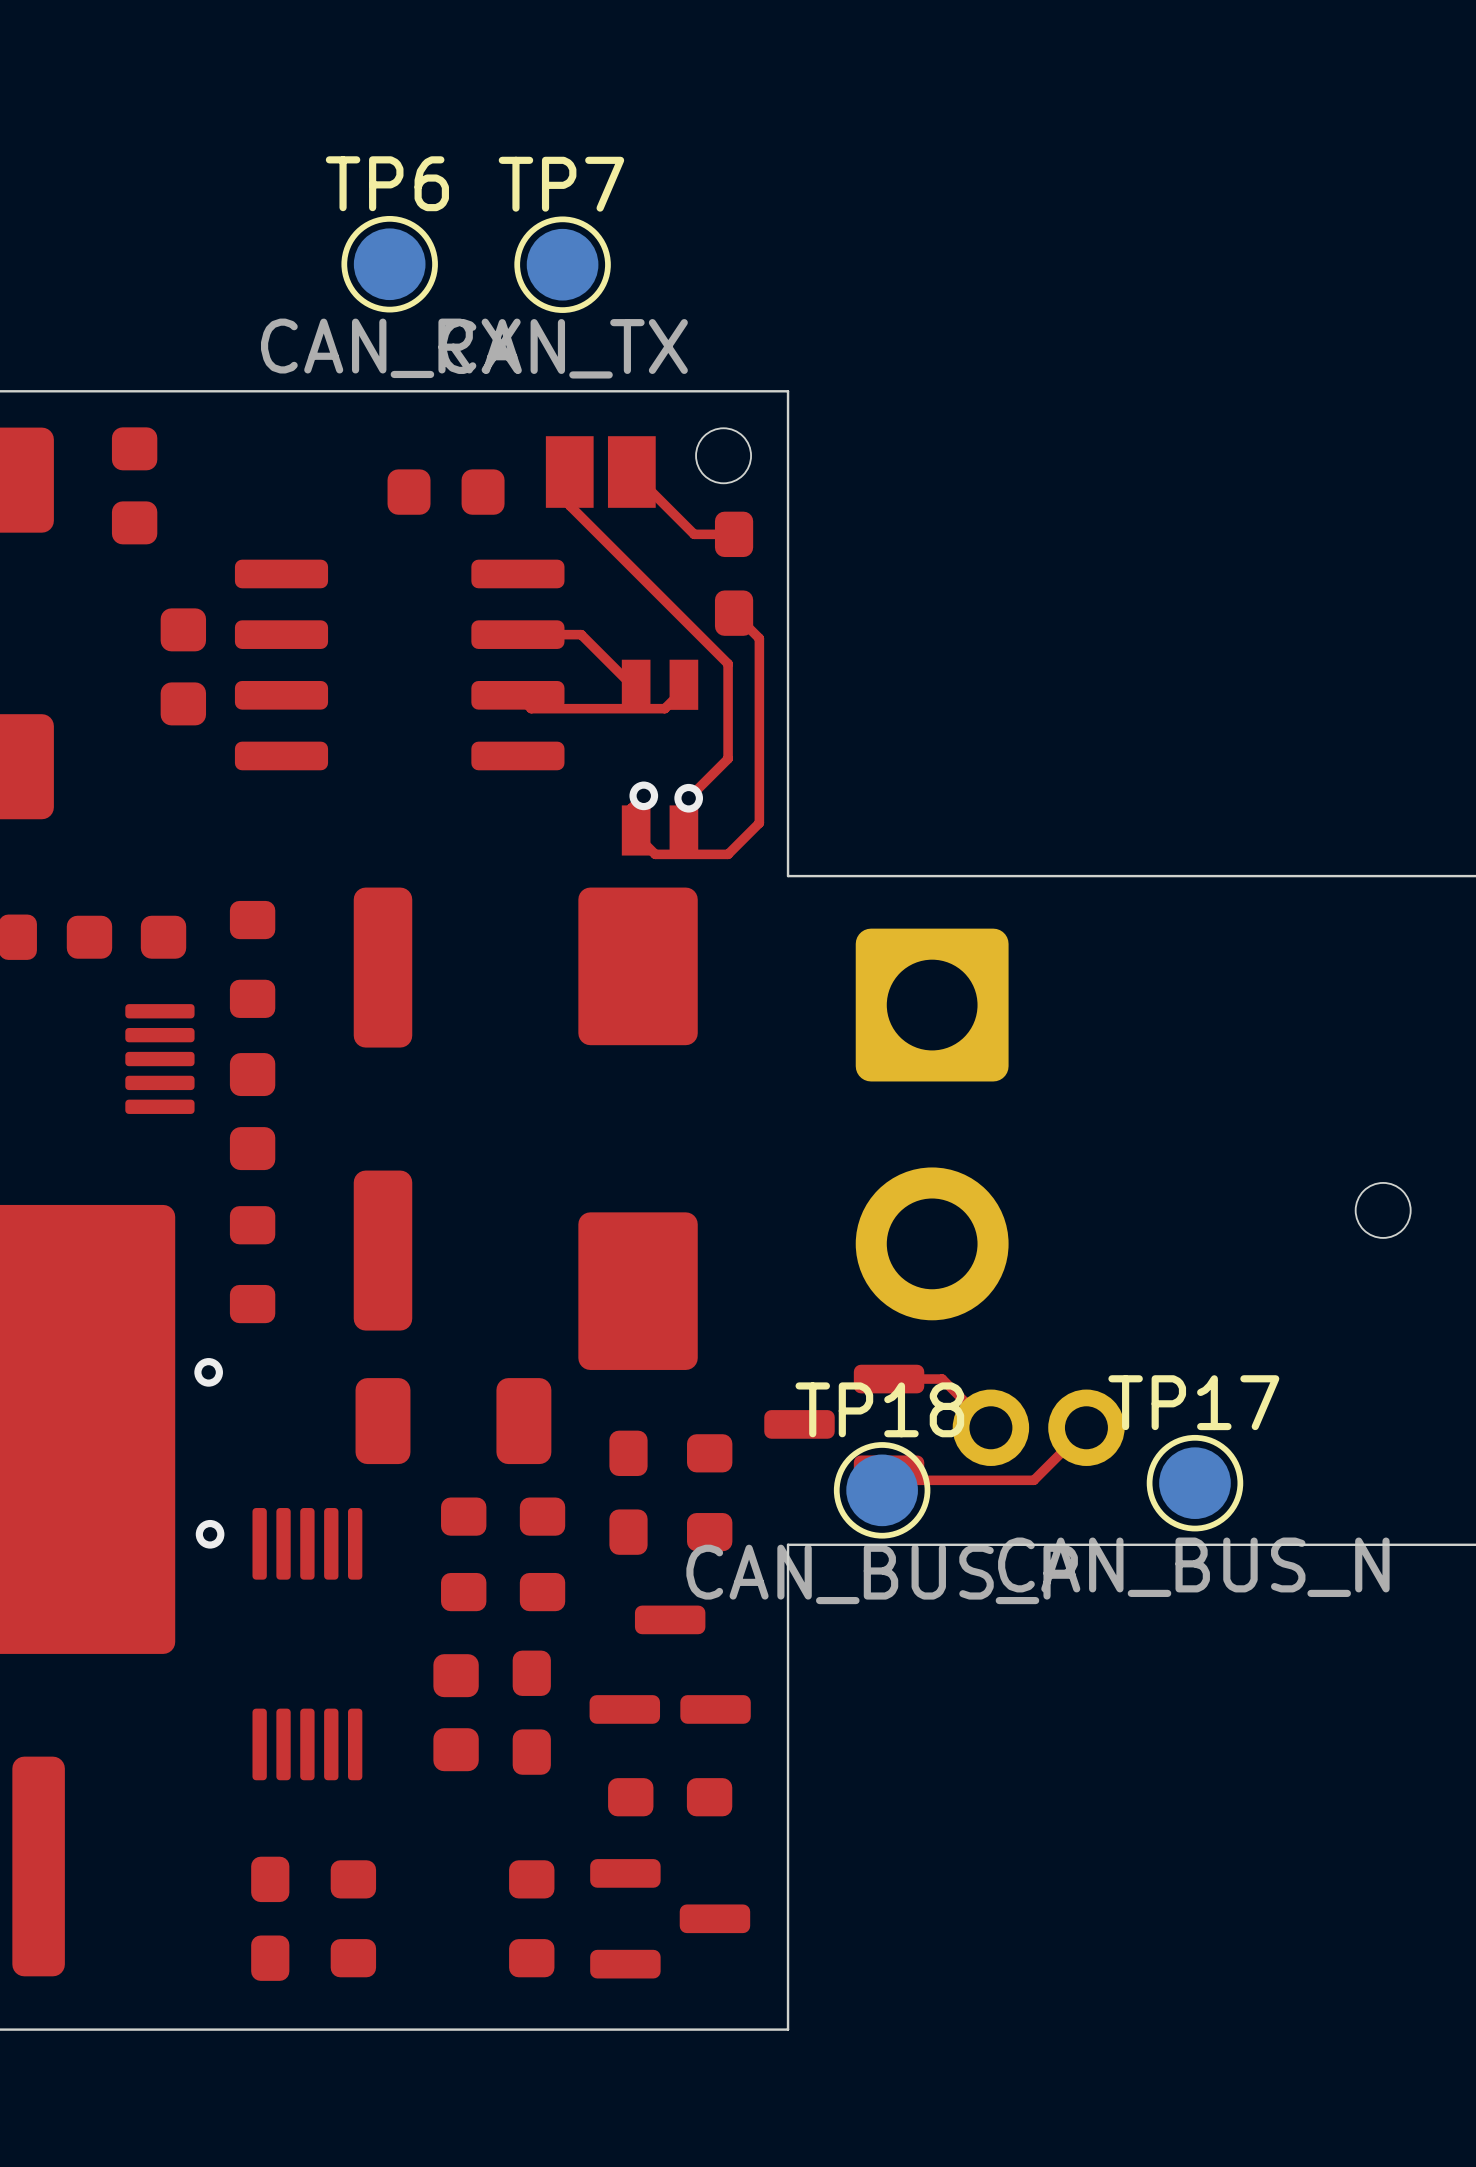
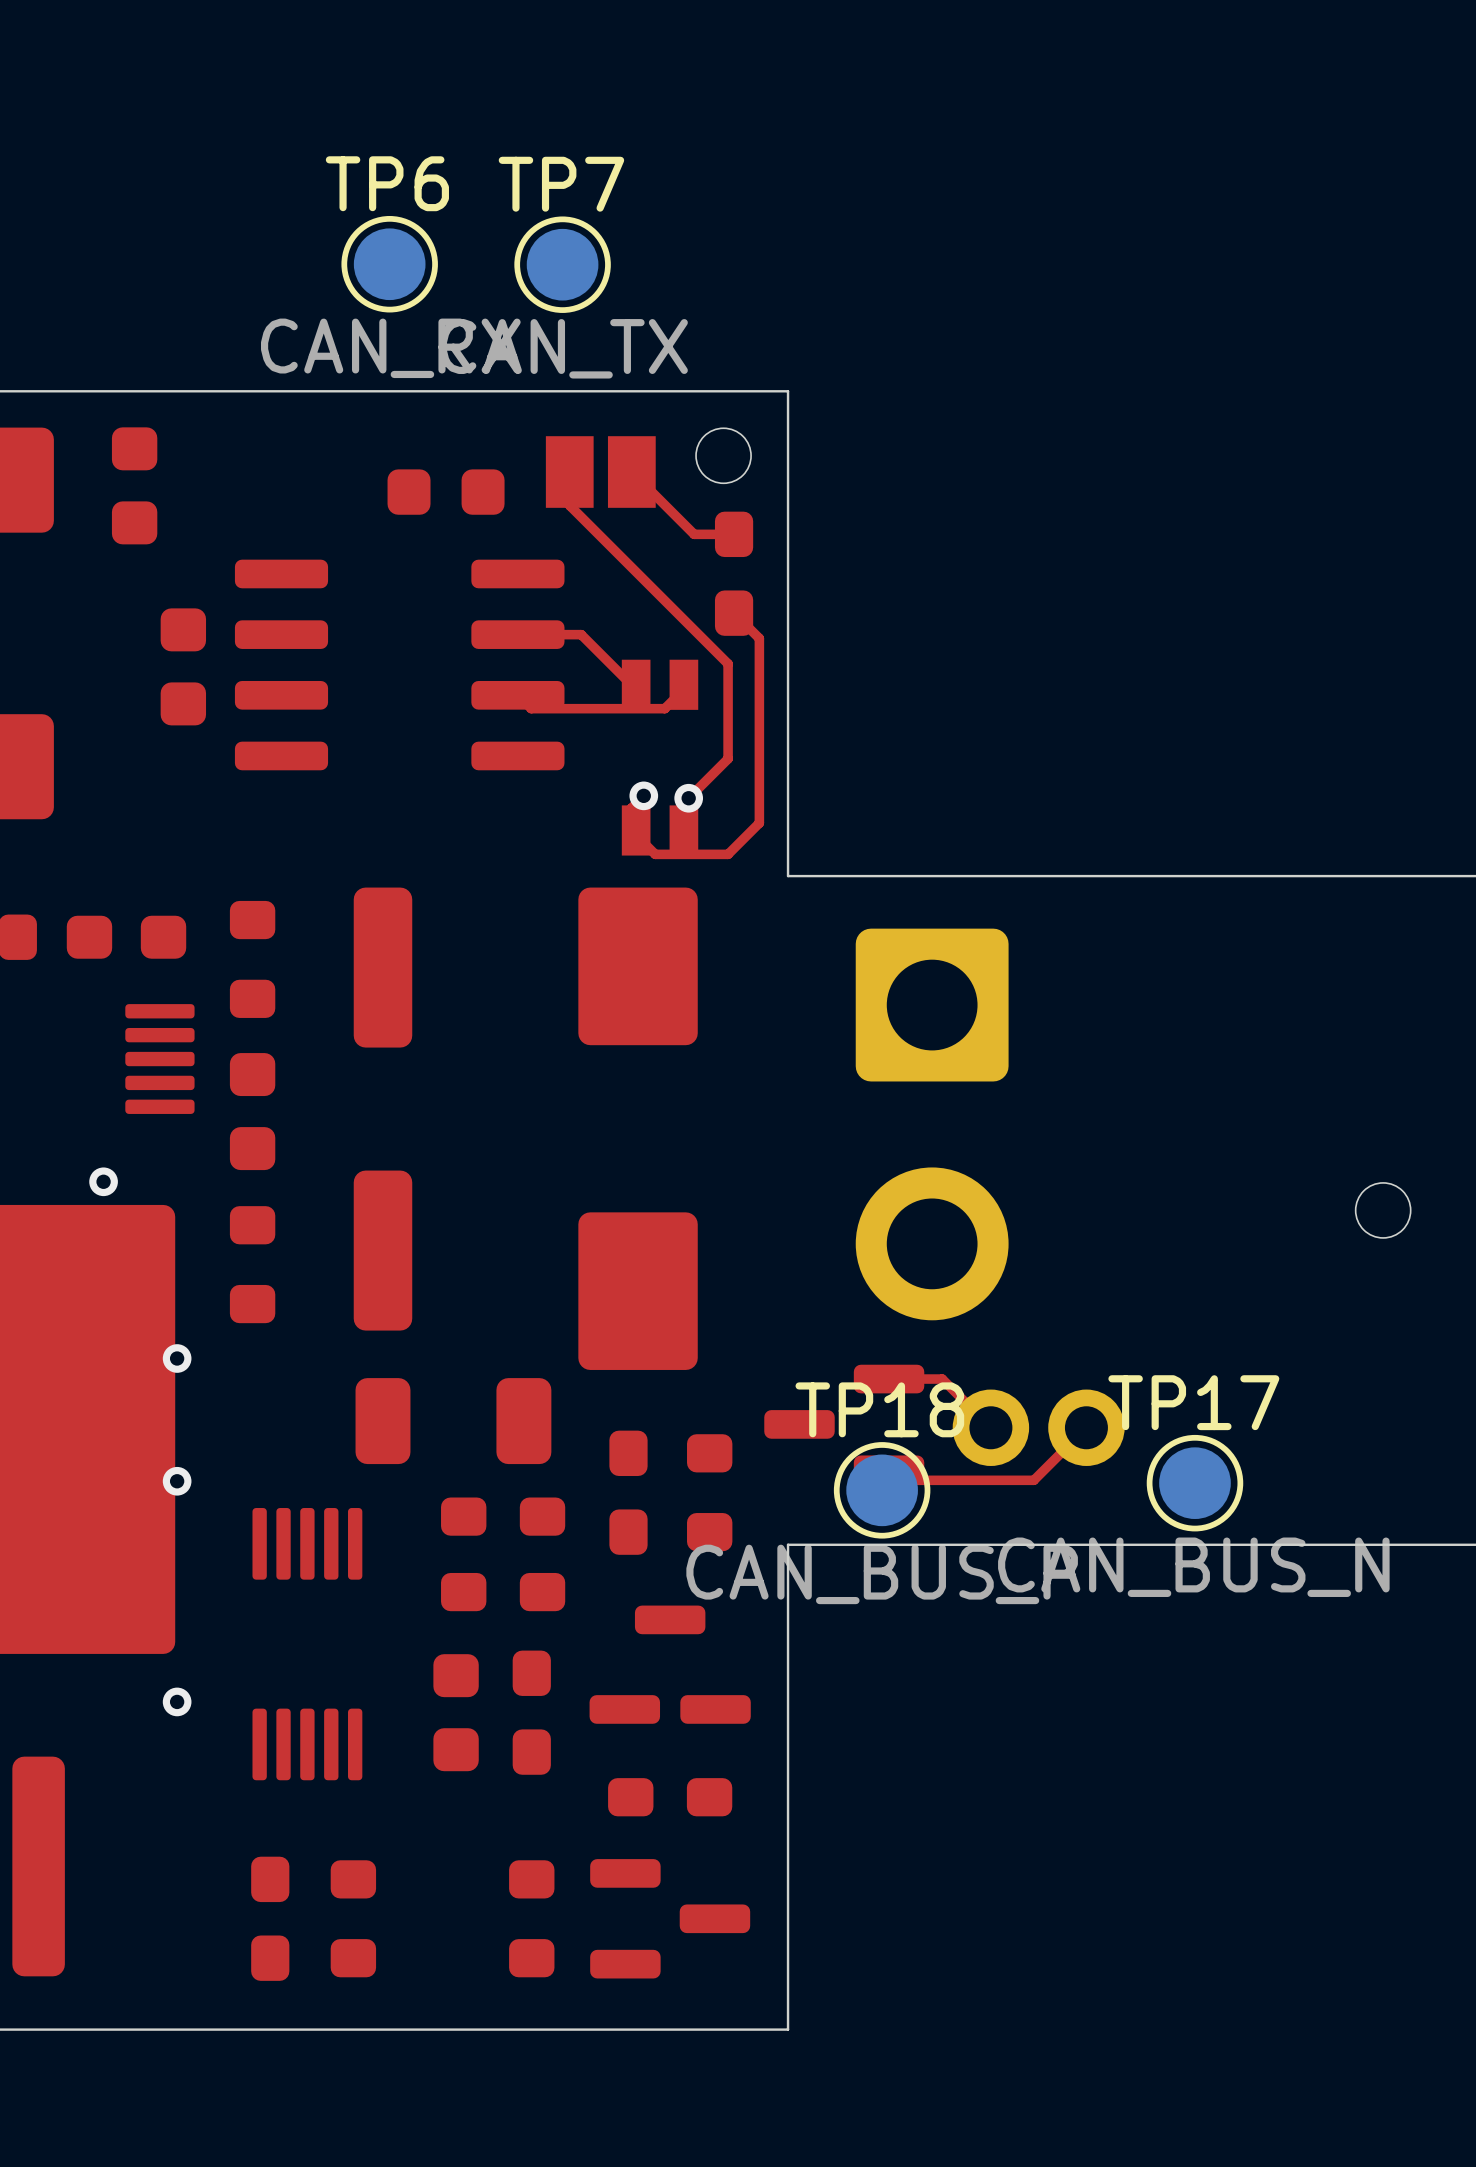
via: none -> (103, 1181)
via position: (208, 1372) -> (177, 1358)
via: none -> (177, 1481)
via: (210, 1534) -> none
via: none -> (177, 1701)

